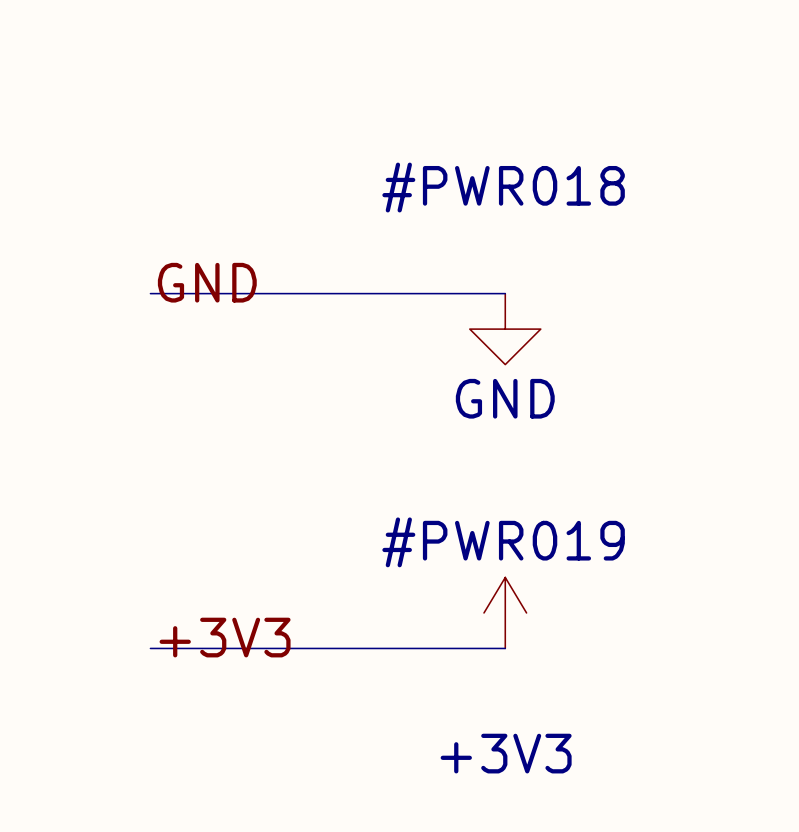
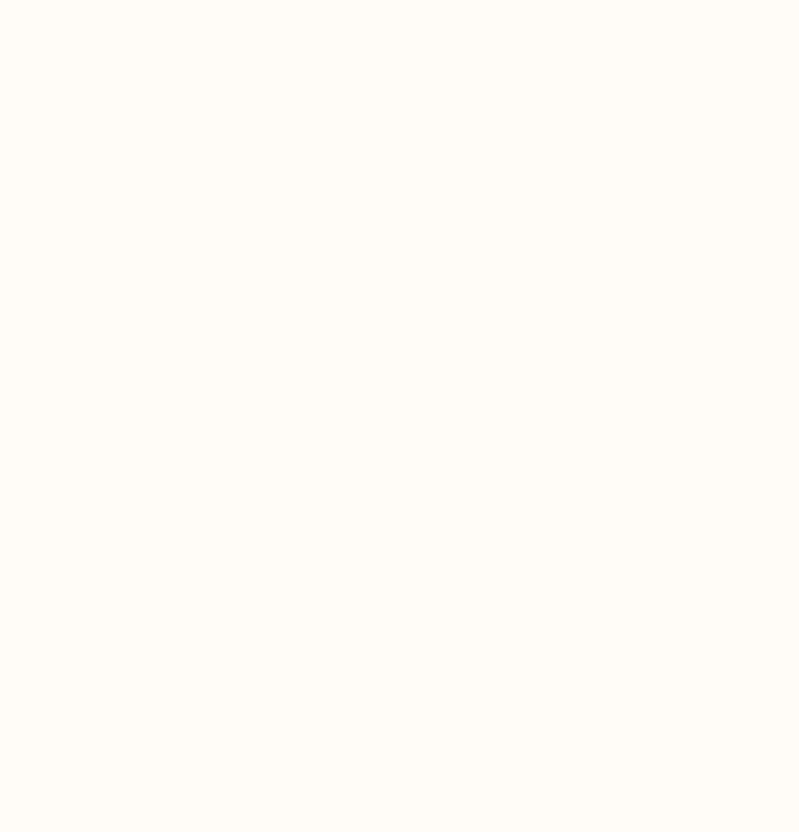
label: GND (207, 282) -> none
wire: (150, 293) (505, 293) -> none
#PWR018: GND (505, 329) -> none
#PWR019: +3V3 (505, 612) -> none
label: +3V3 (225, 637) -> none
wire: (150, 648) (505, 648) -> none

